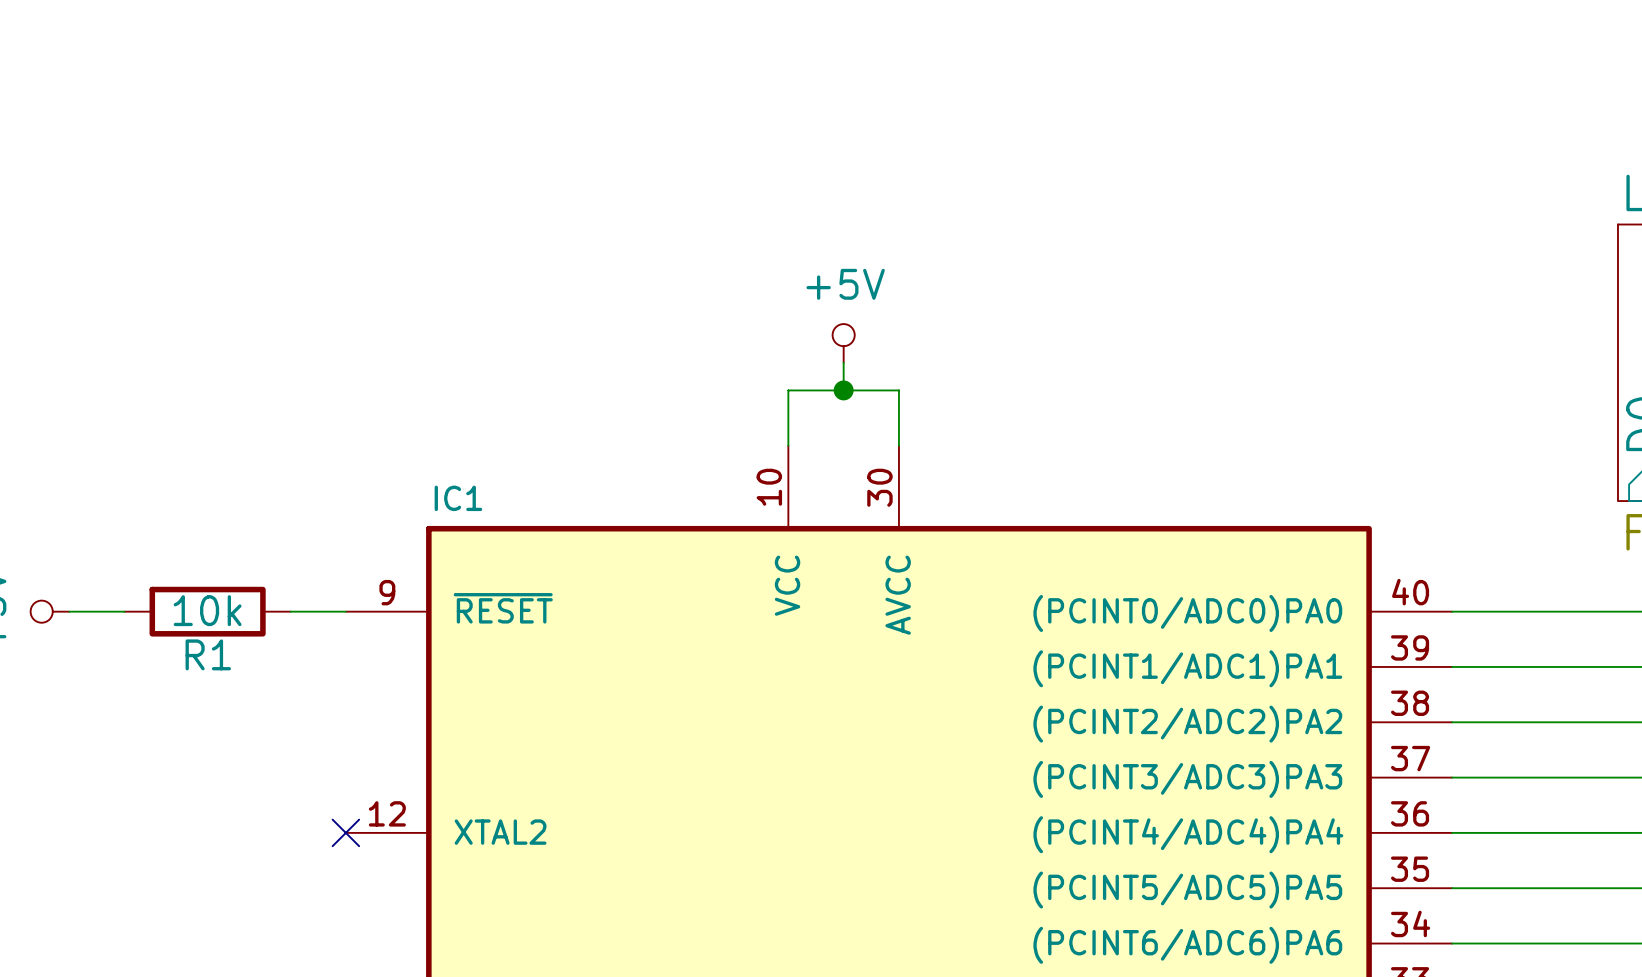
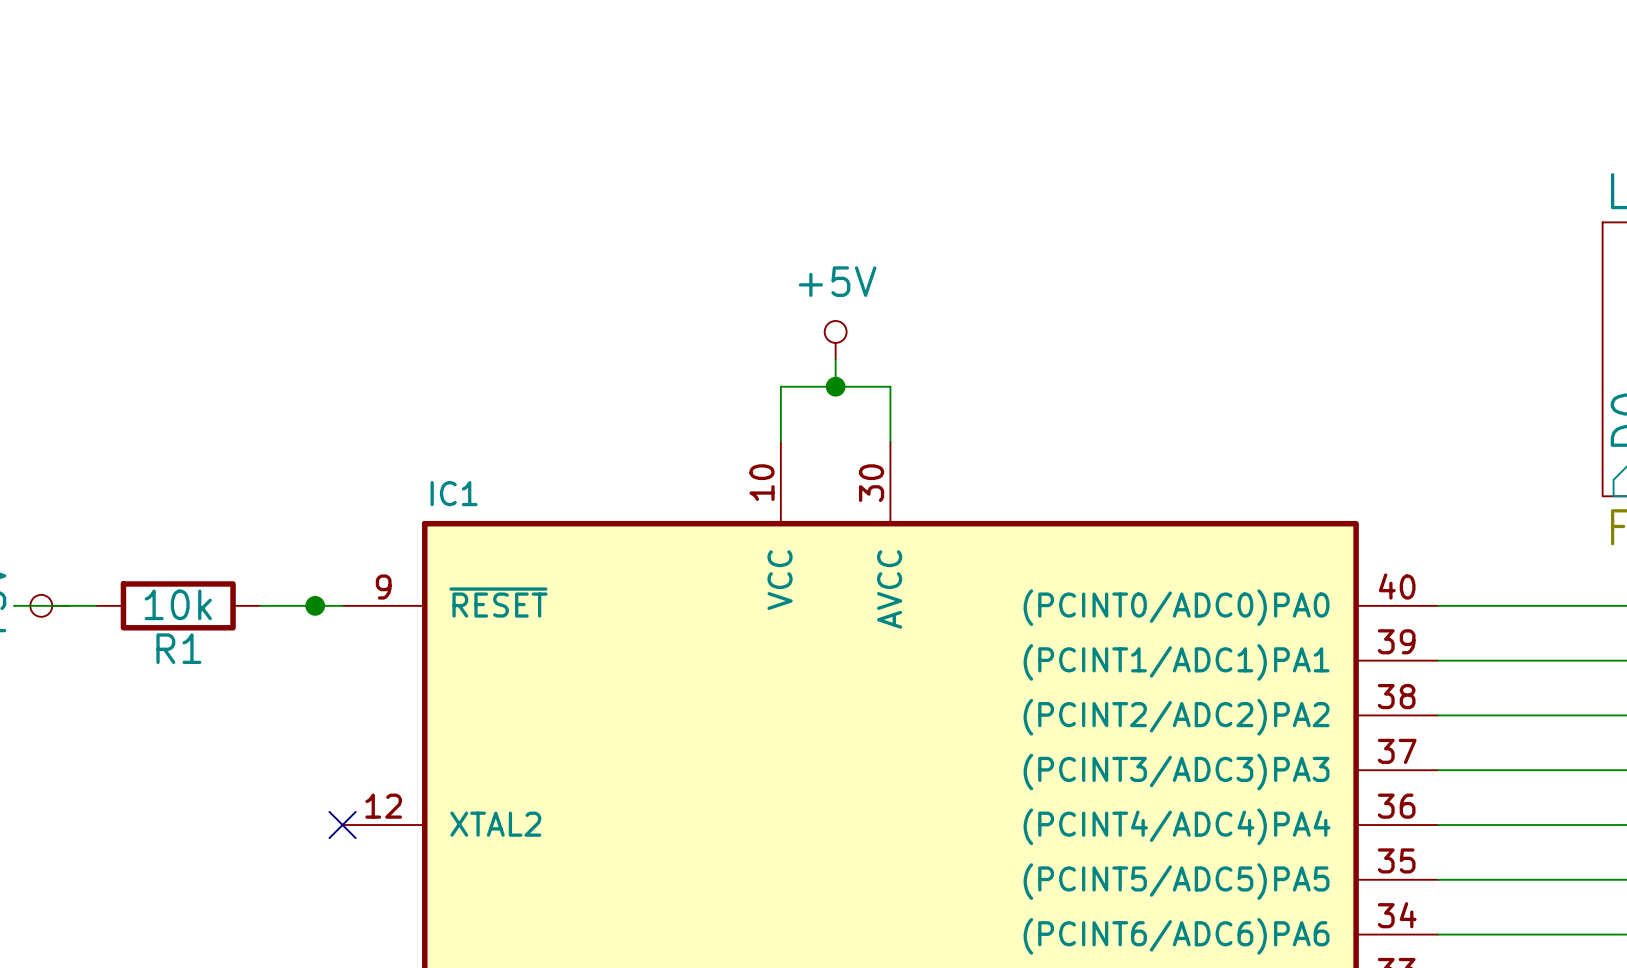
wire: none -> (13, 605) (68, 605)
R1 position: (207, 611) -> (178, 605)
junction: none -> (315, 605)

